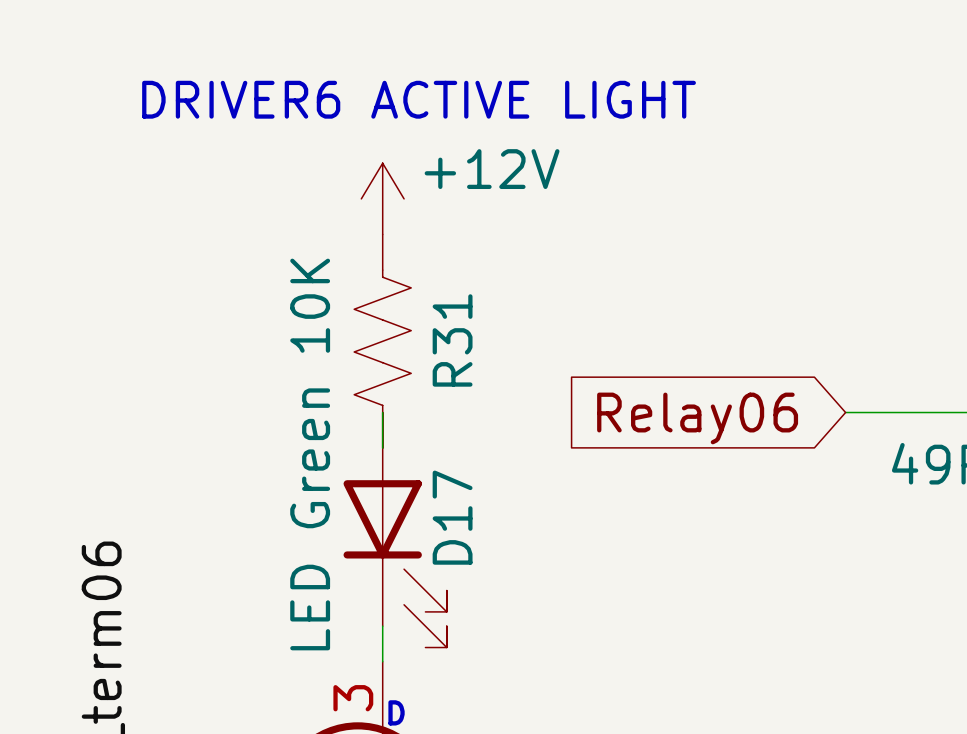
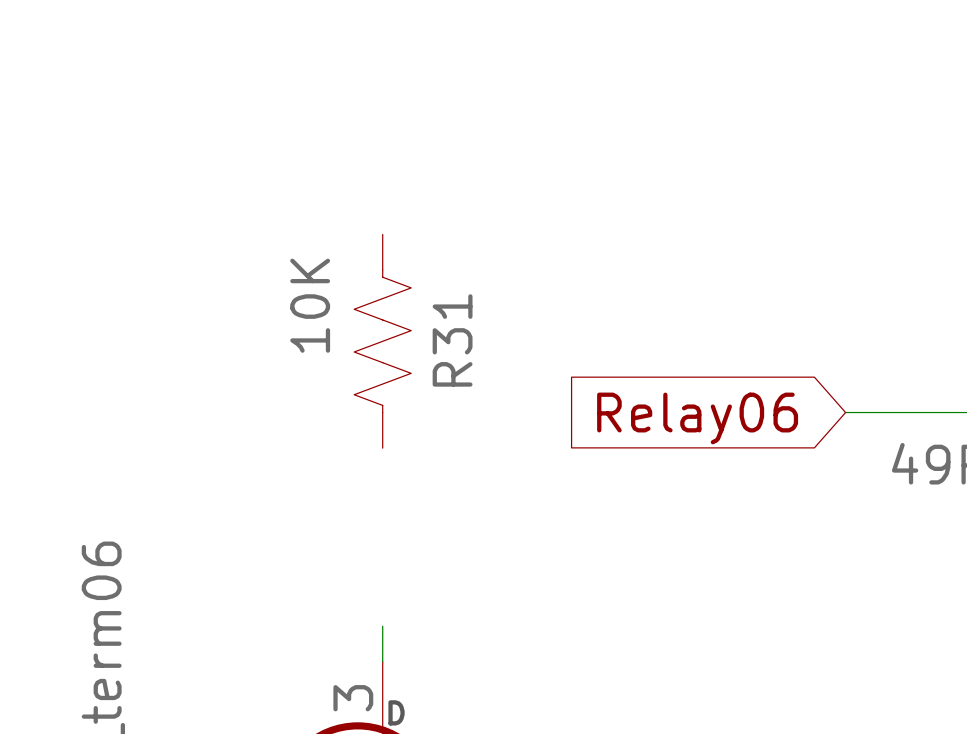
text: DRIVER6 ACTIVE LIGHT (419, 99) -> none
power symbol: +12V (382, 198) -> none
D17: LED Green (395, 530) -> none

